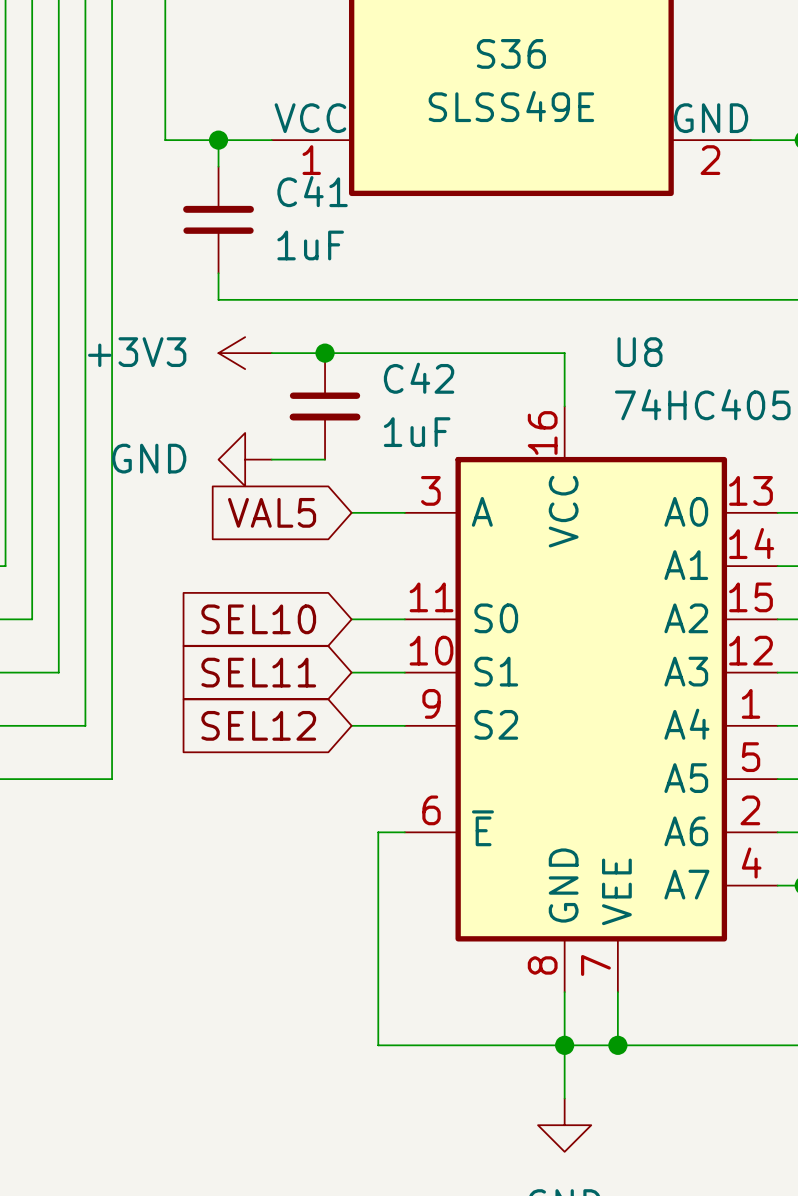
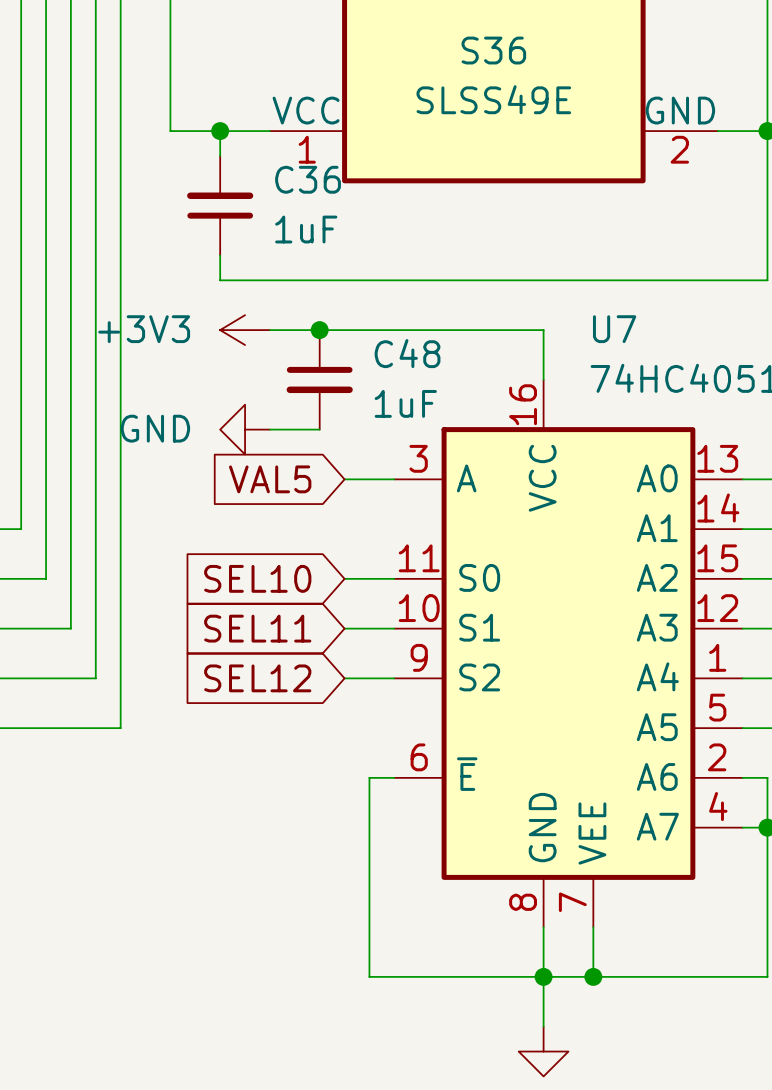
C41 name: C41 (312, 191) -> C36 (308, 179)
U8 name: U8 (640, 352) -> U7 (614, 329)
C42 name: C42 (419, 378) -> C48 (407, 353)

